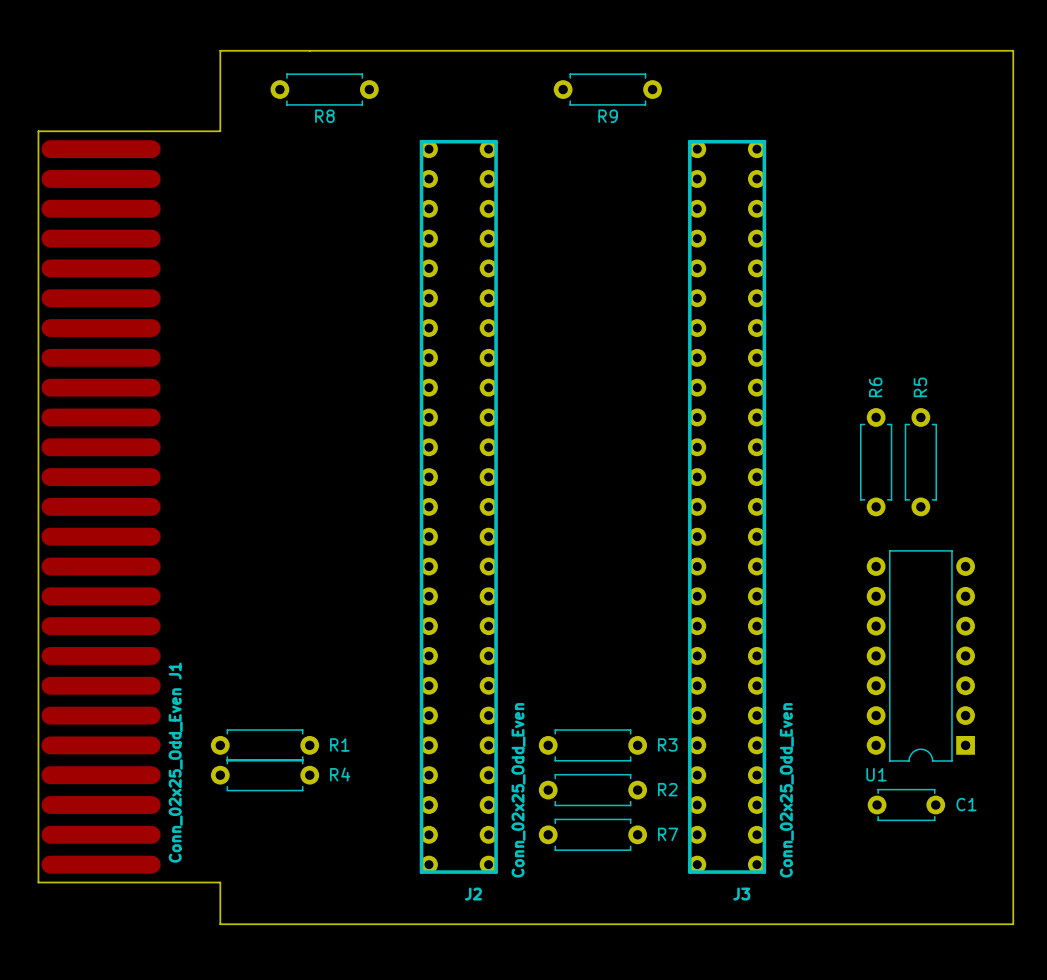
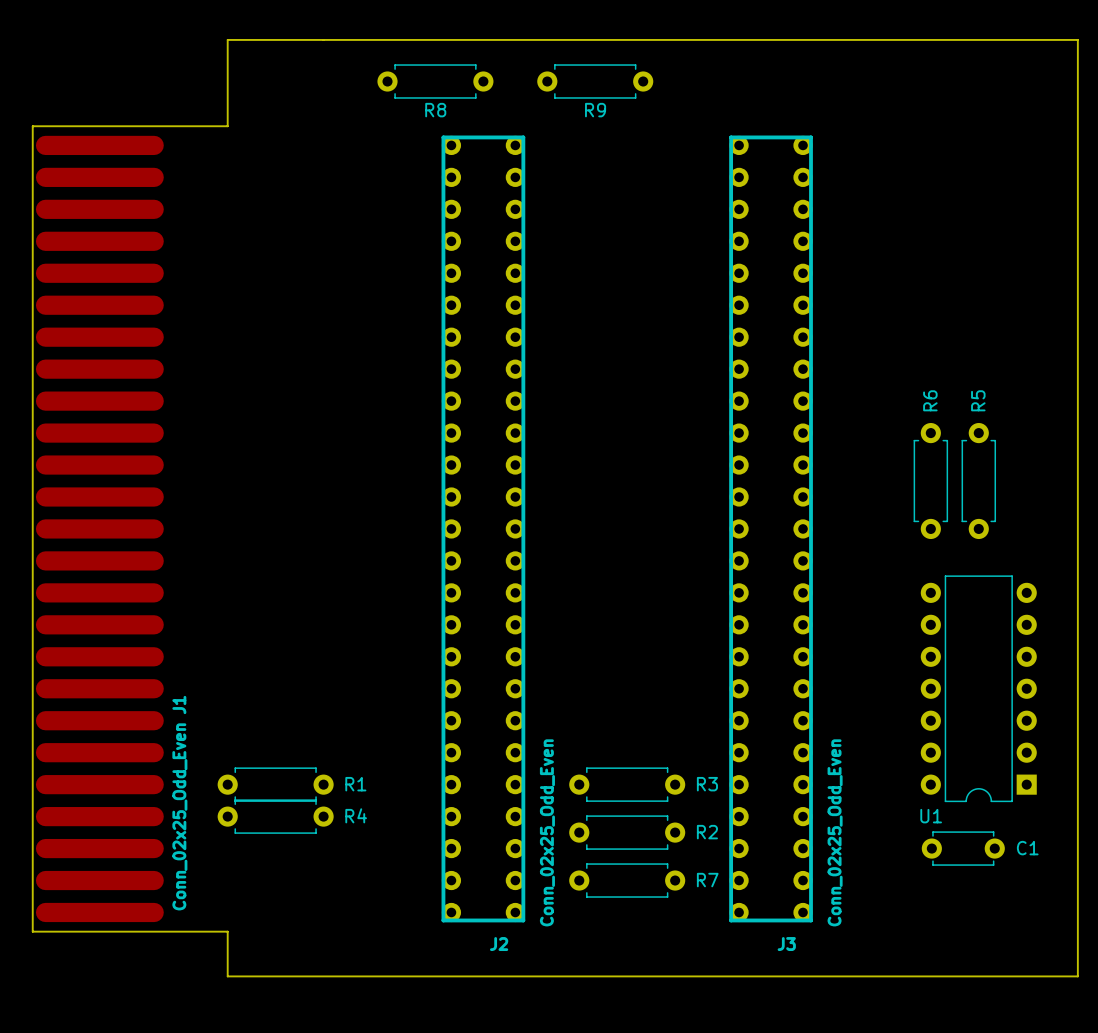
R8 position: (324, 89) -> (435, 81)
R9 position: (607, 89) -> (595, 81)

